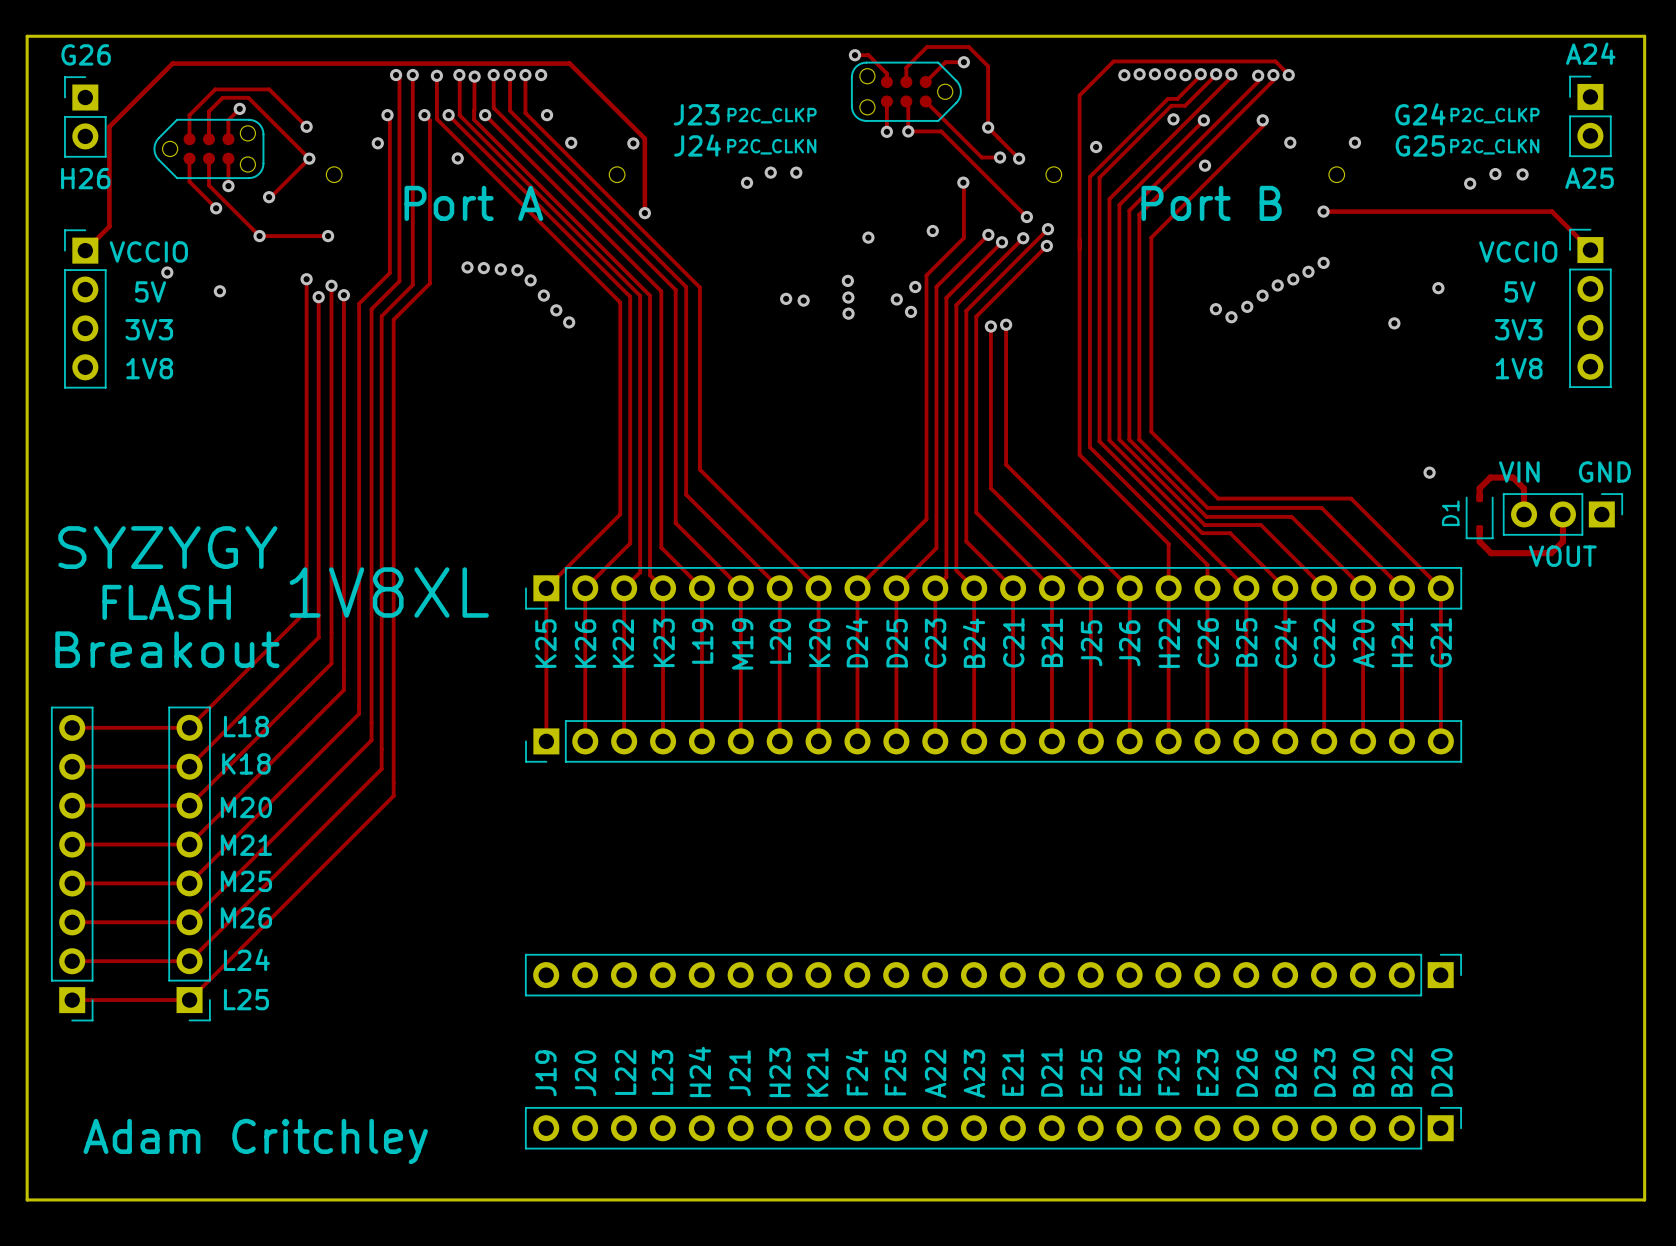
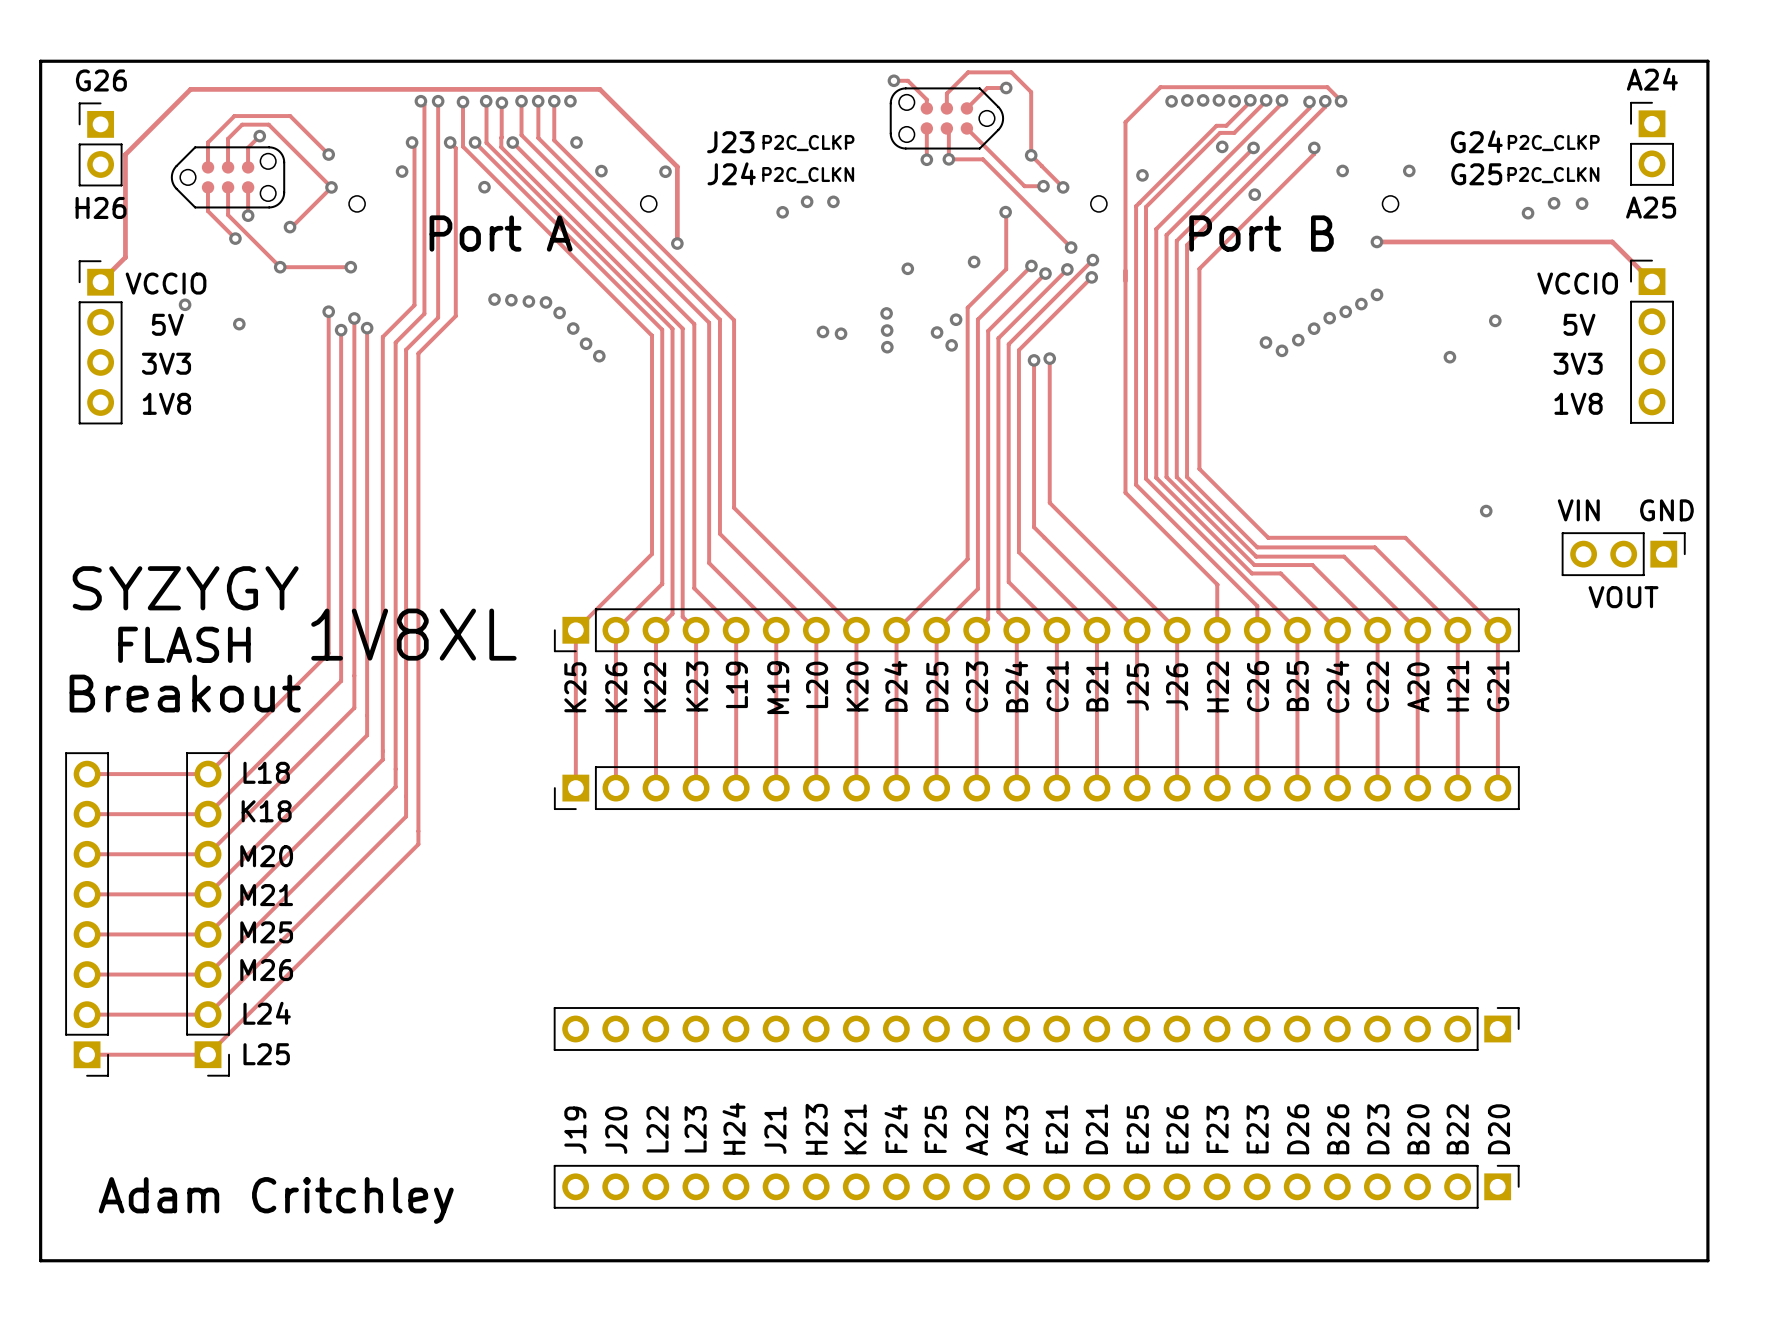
track: (1479, 497) (1479, 488) (1490, 477) (1512, 477) (1524, 488) (1524, 514) -> none
track: (1562, 514) (1562, 541) (1551, 553) (1491, 553) (1479, 541) (1479, 529) -> none
D1: (1479, 516) -> none

